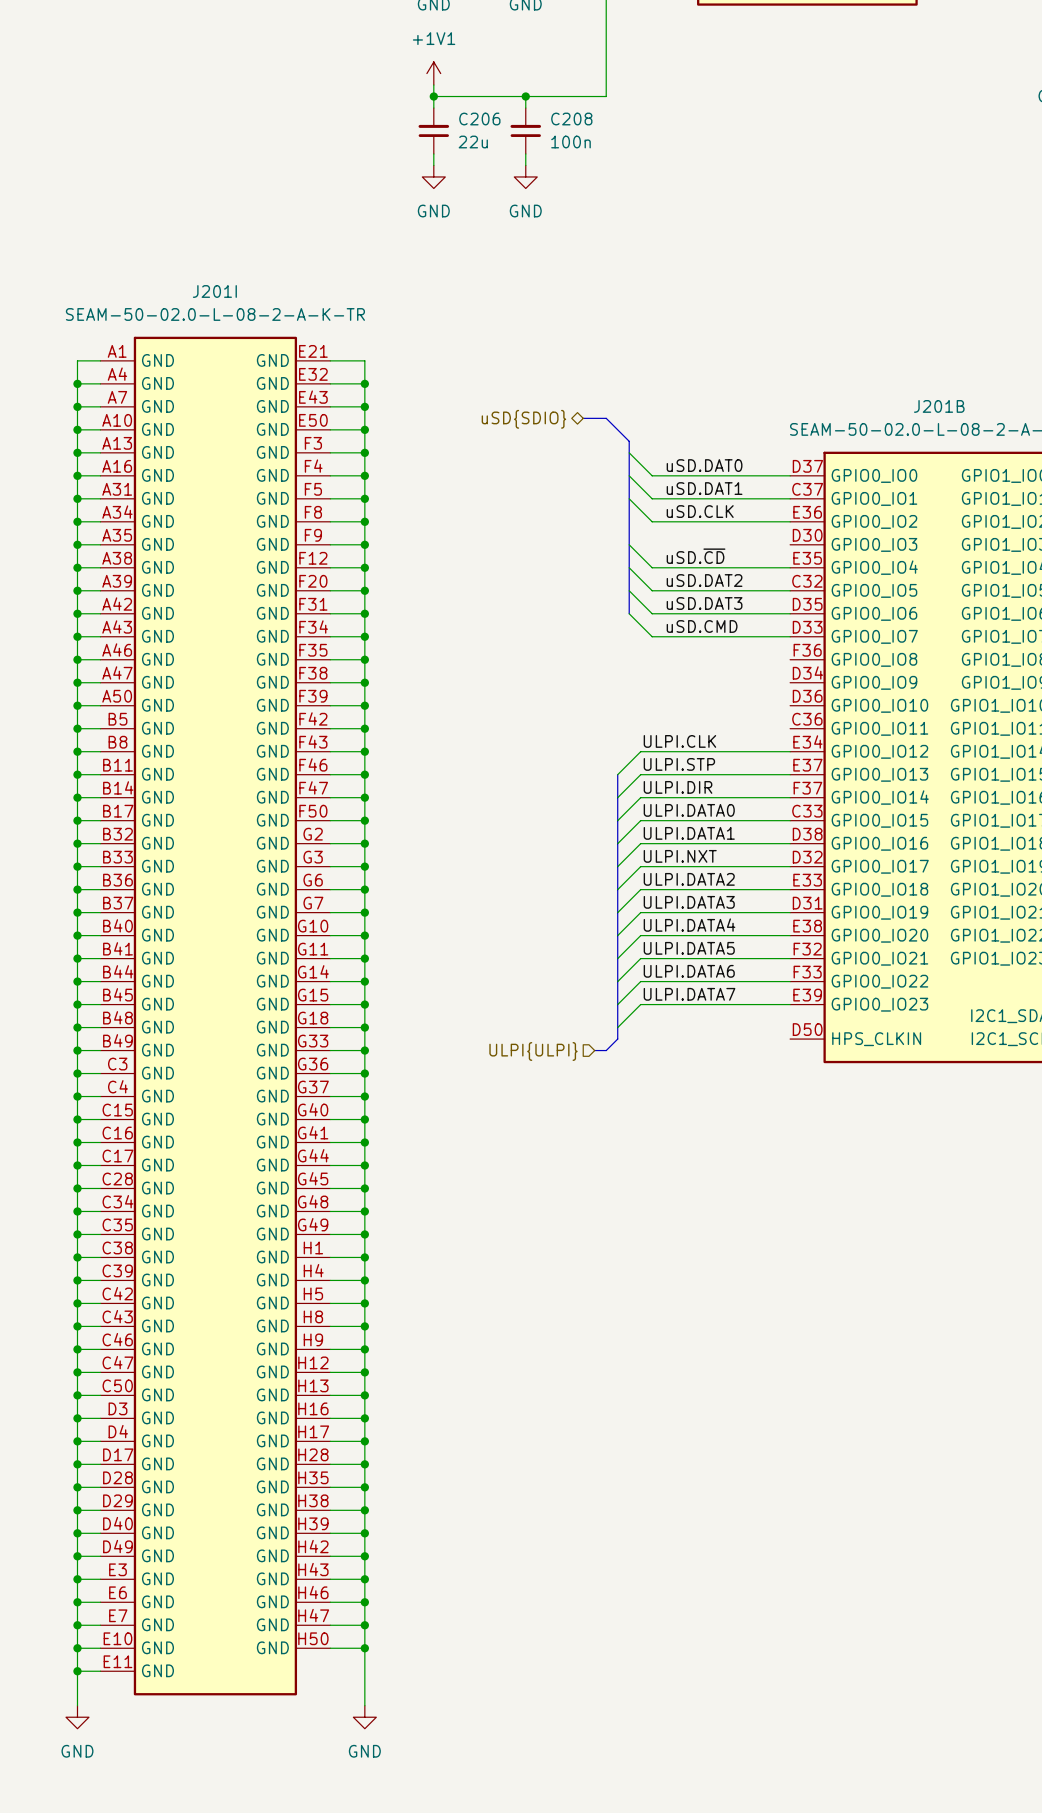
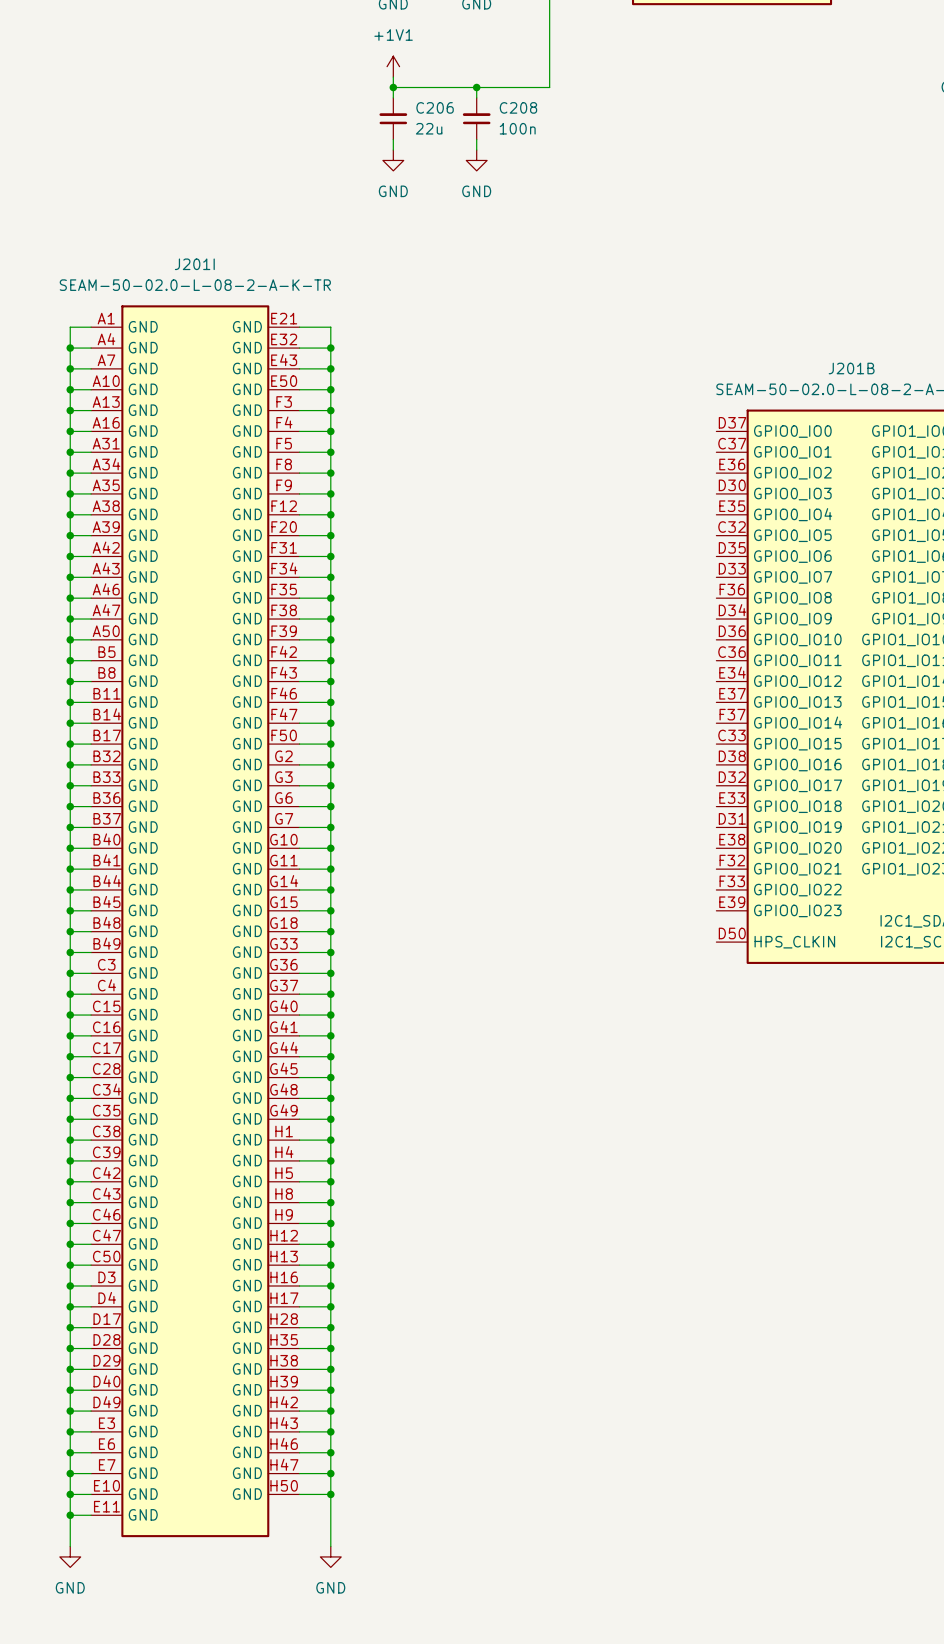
bus: (583, 418) (606, 418) (629, 441) (629, 613) -> none
hierarchical label: uSD{SDIO} (523, 419) -> none
wire: (629, 452) (652, 475) (790, 475) -> none
label: uSD.DAT0 (704, 465) -> none
wire: (629, 475) (652, 498) (790, 498) -> none
label: uSD.DAT1 (704, 488) -> none
wire: (629, 498) (652, 521) (790, 521) -> none
label: uSD.CLK (700, 511) -> none
wire: (629, 544) (652, 567) (790, 567) -> none
label: uSD.~{CD} (696, 556) -> none
wire: (629, 567) (652, 590) (790, 590) -> none
label: uSD.DAT2 (704, 580) -> none
wire: (629, 590) (652, 613) (790, 613) -> none
label: uSD.DAT3 (704, 603) -> none
wire: (629, 613) (652, 636) (790, 636) -> none
label: uSD.CMD (702, 626) -> none
label: ULPI.CLK (679, 741) -> none
wire: (790, 751) (640, 751) (617, 774) -> none
label: ULPI.STP (679, 764) -> none
bus: (617, 774) (617, 1039) (606, 1050) (594, 1050) -> none
wire: (790, 774) (640, 774) (617, 797) -> none
label: ULPI.DIR (678, 787) -> none
wire: (790, 797) (640, 797) (617, 820) -> none
label: ULPI.DATA0 (689, 810) -> none
wire: (790, 820) (640, 820) (617, 843) -> none
label: ULPI.DATA1 (689, 833) -> none
wire: (790, 843) (640, 843) (617, 866) -> none
label: ULPI.NXT (680, 856) -> none
wire: (790, 866) (640, 866) (617, 889) -> none
label: ULPI.DATA2 (689, 879) -> none
wire: (790, 889) (640, 889) (617, 912) -> none
label: ULPI.DATA3 (689, 902) -> none
wire: (790, 912) (640, 912) (617, 935) -> none
label: ULPI.DATA4 (689, 925) -> none
wire: (790, 935) (640, 935) (617, 958) -> none
label: ULPI.DATA5 (689, 948) -> none
wire: (790, 958) (640, 958) (617, 981) -> none
label: ULPI.DATA6 (689, 971) -> none
wire: (790, 981) (640, 981) (617, 1004) -> none
label: ULPI.DATA7 (689, 994) -> none
wire: (790, 1004) (640, 1004) (617, 1027) -> none
hierarchical label: ULPI{ULPI} (533, 1051) -> none

